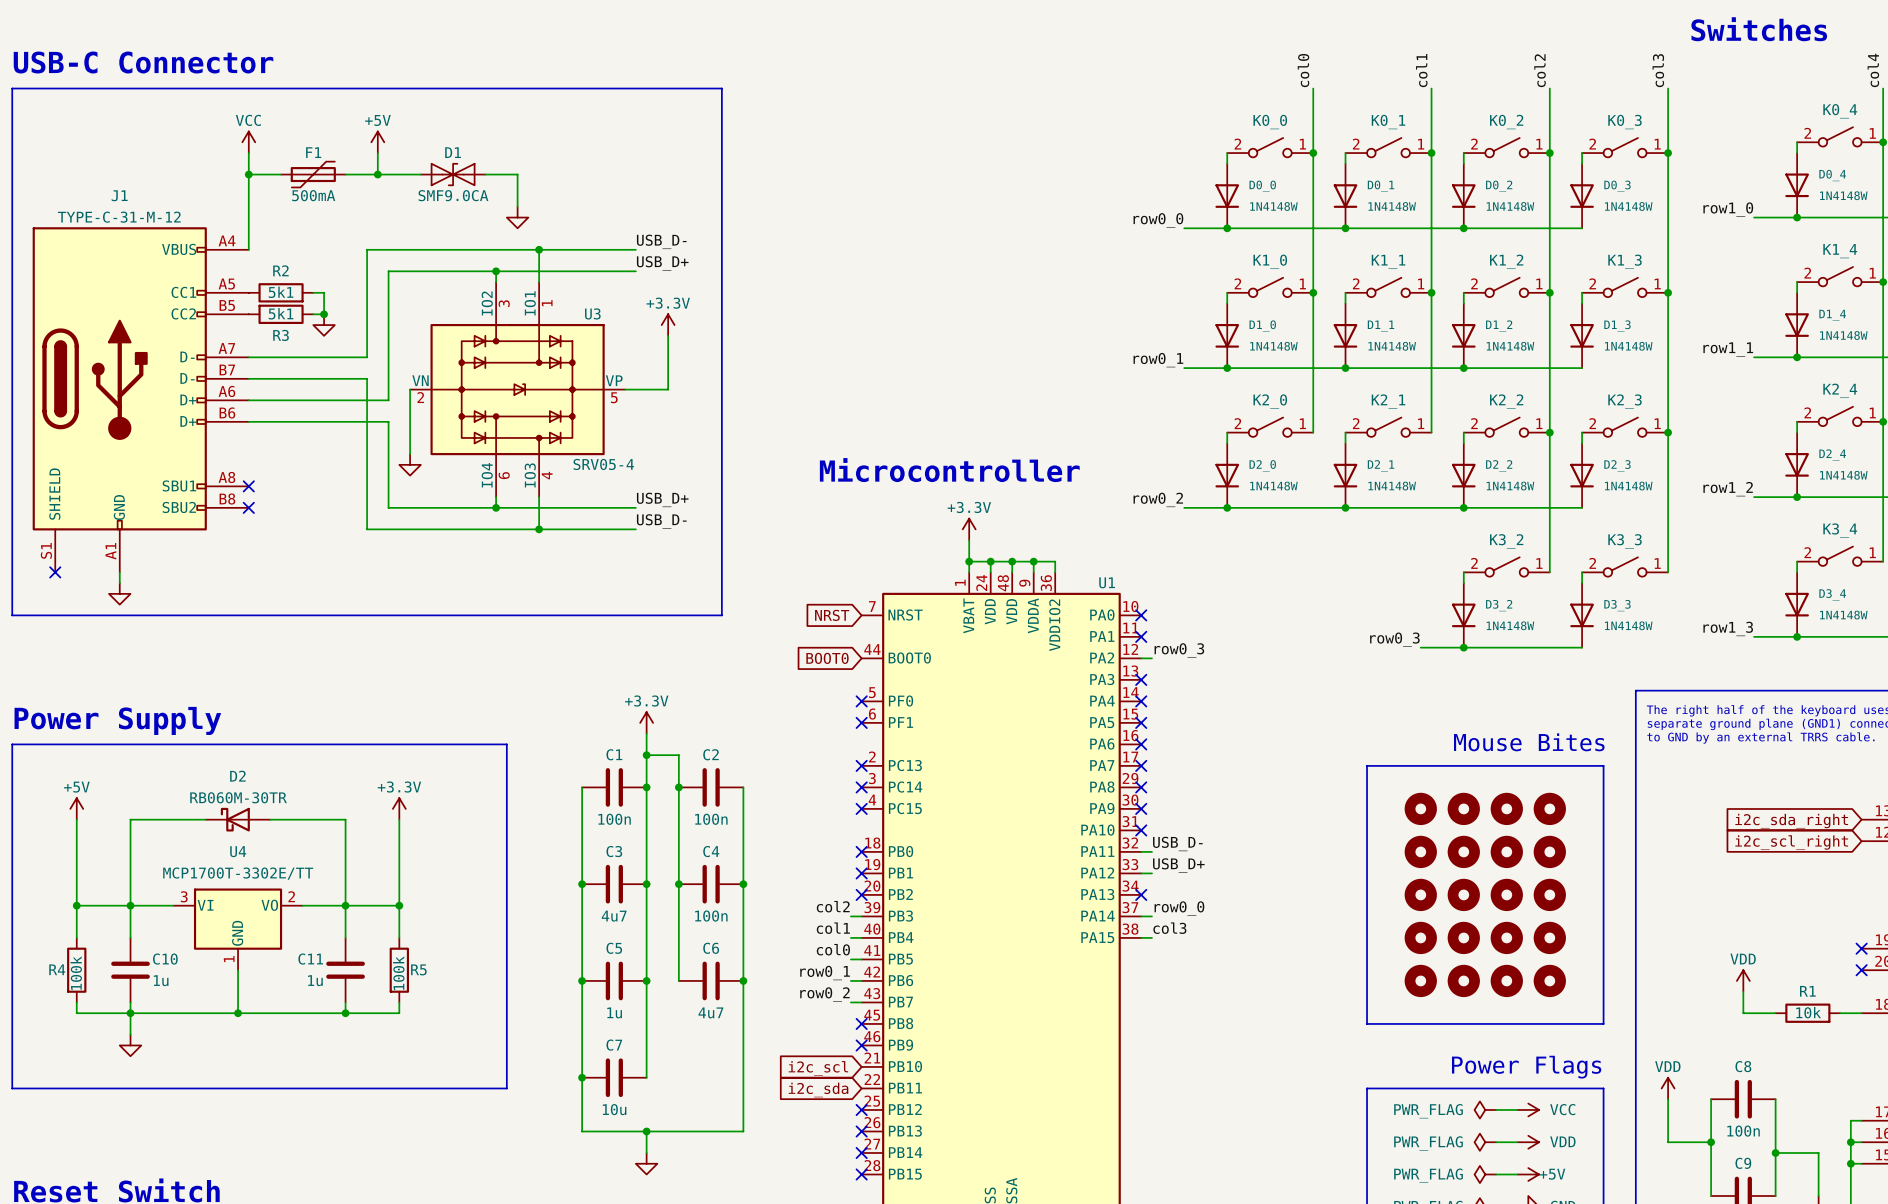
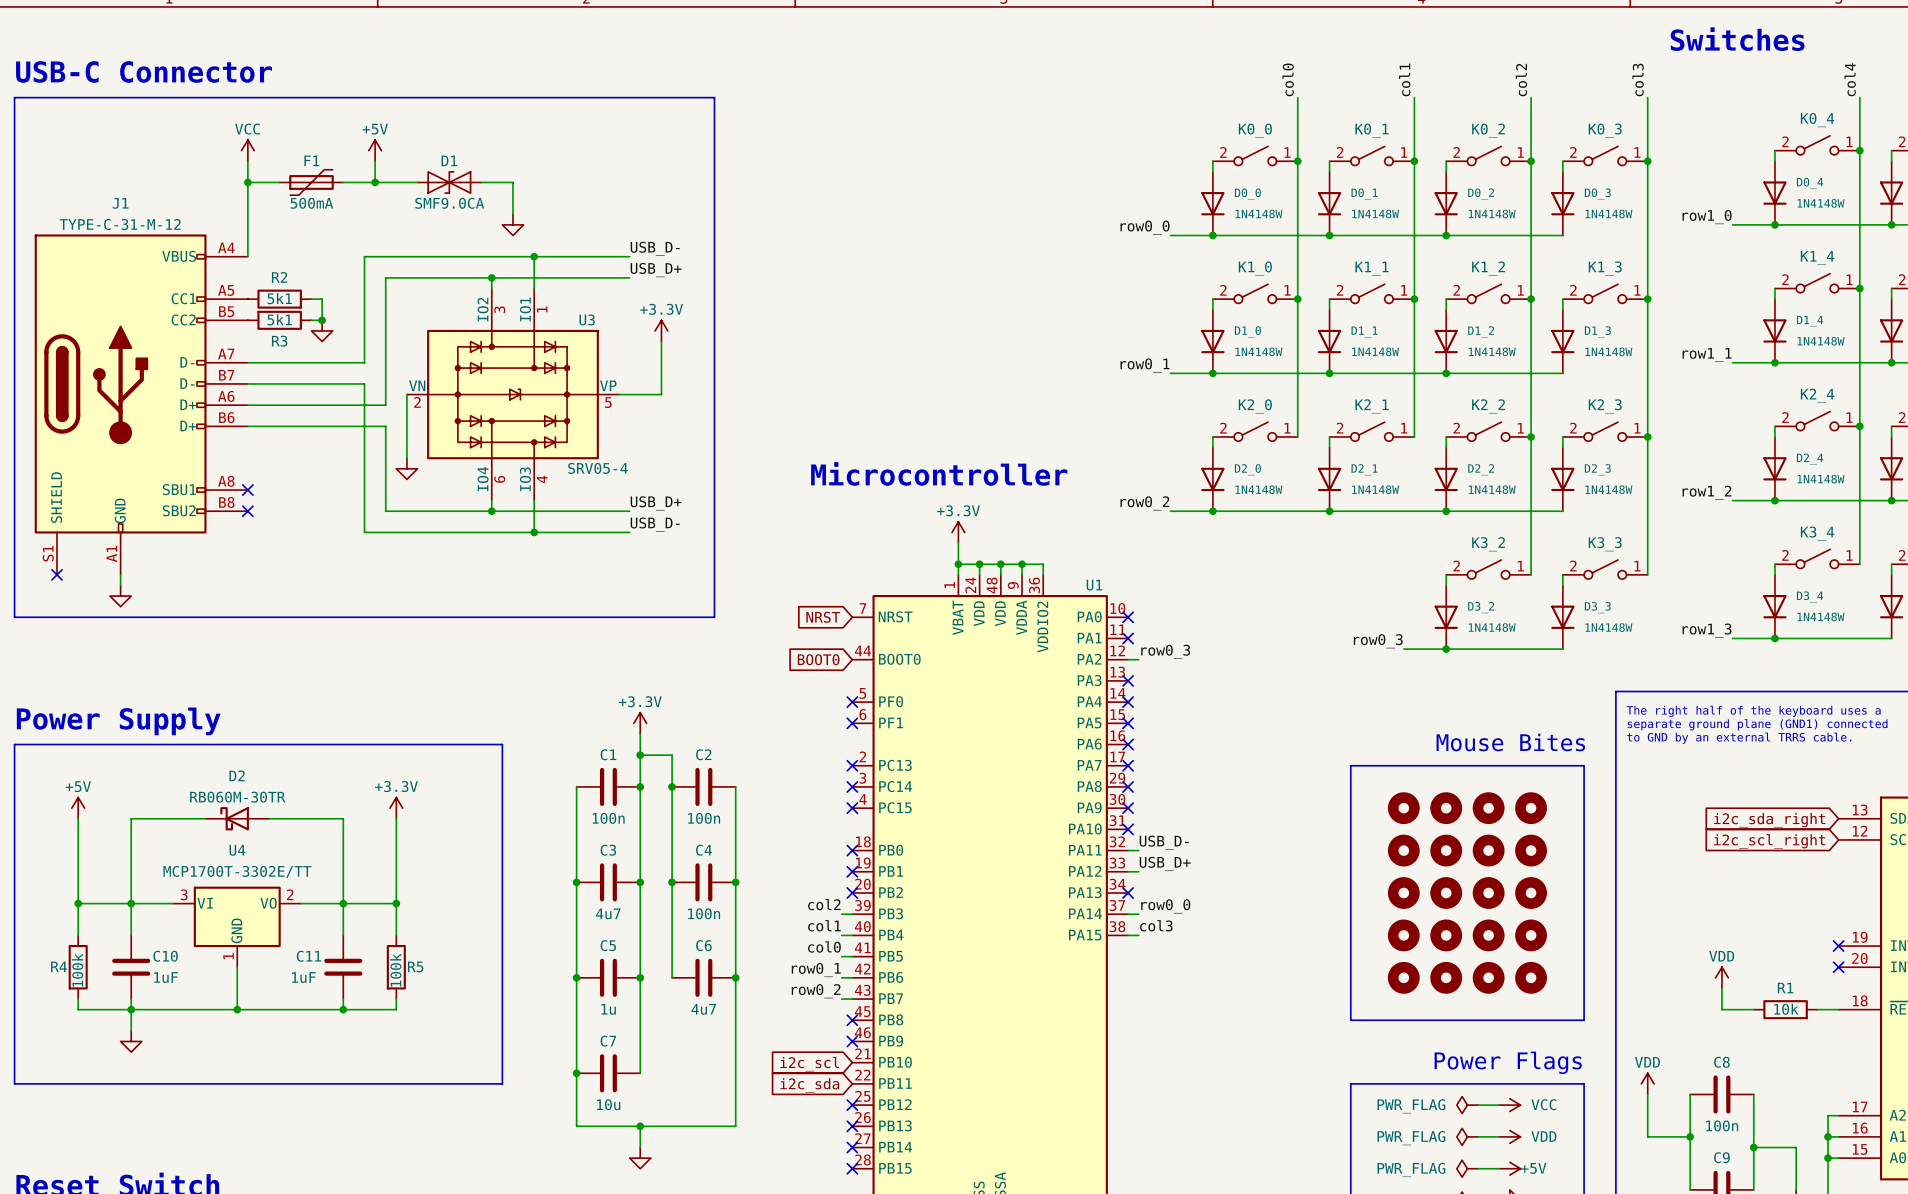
C10 value: 1u (161, 980) -> 1uF (166, 977)
C11 value: 1u (315, 980) -> 1uF (303, 977)

